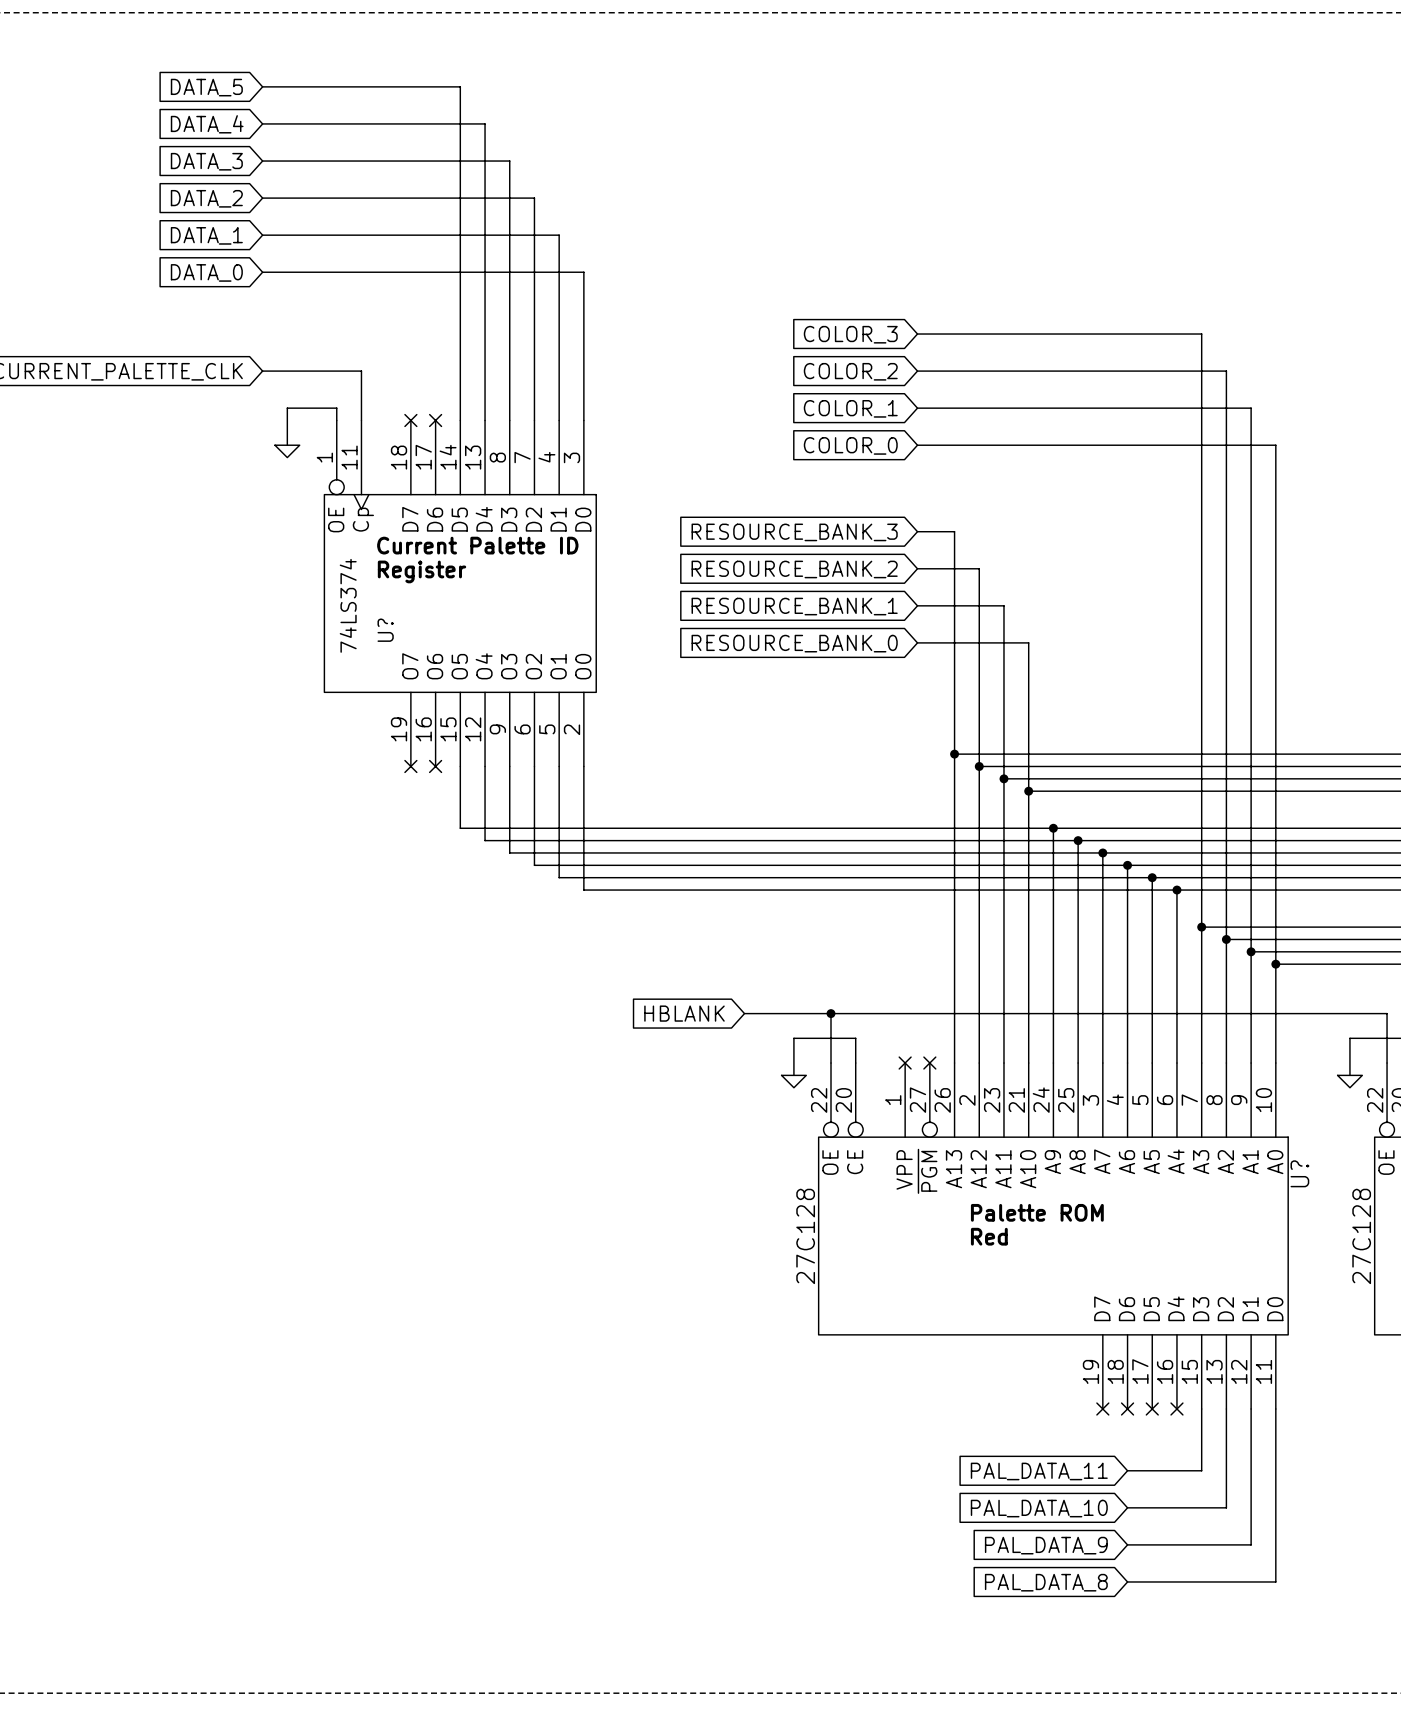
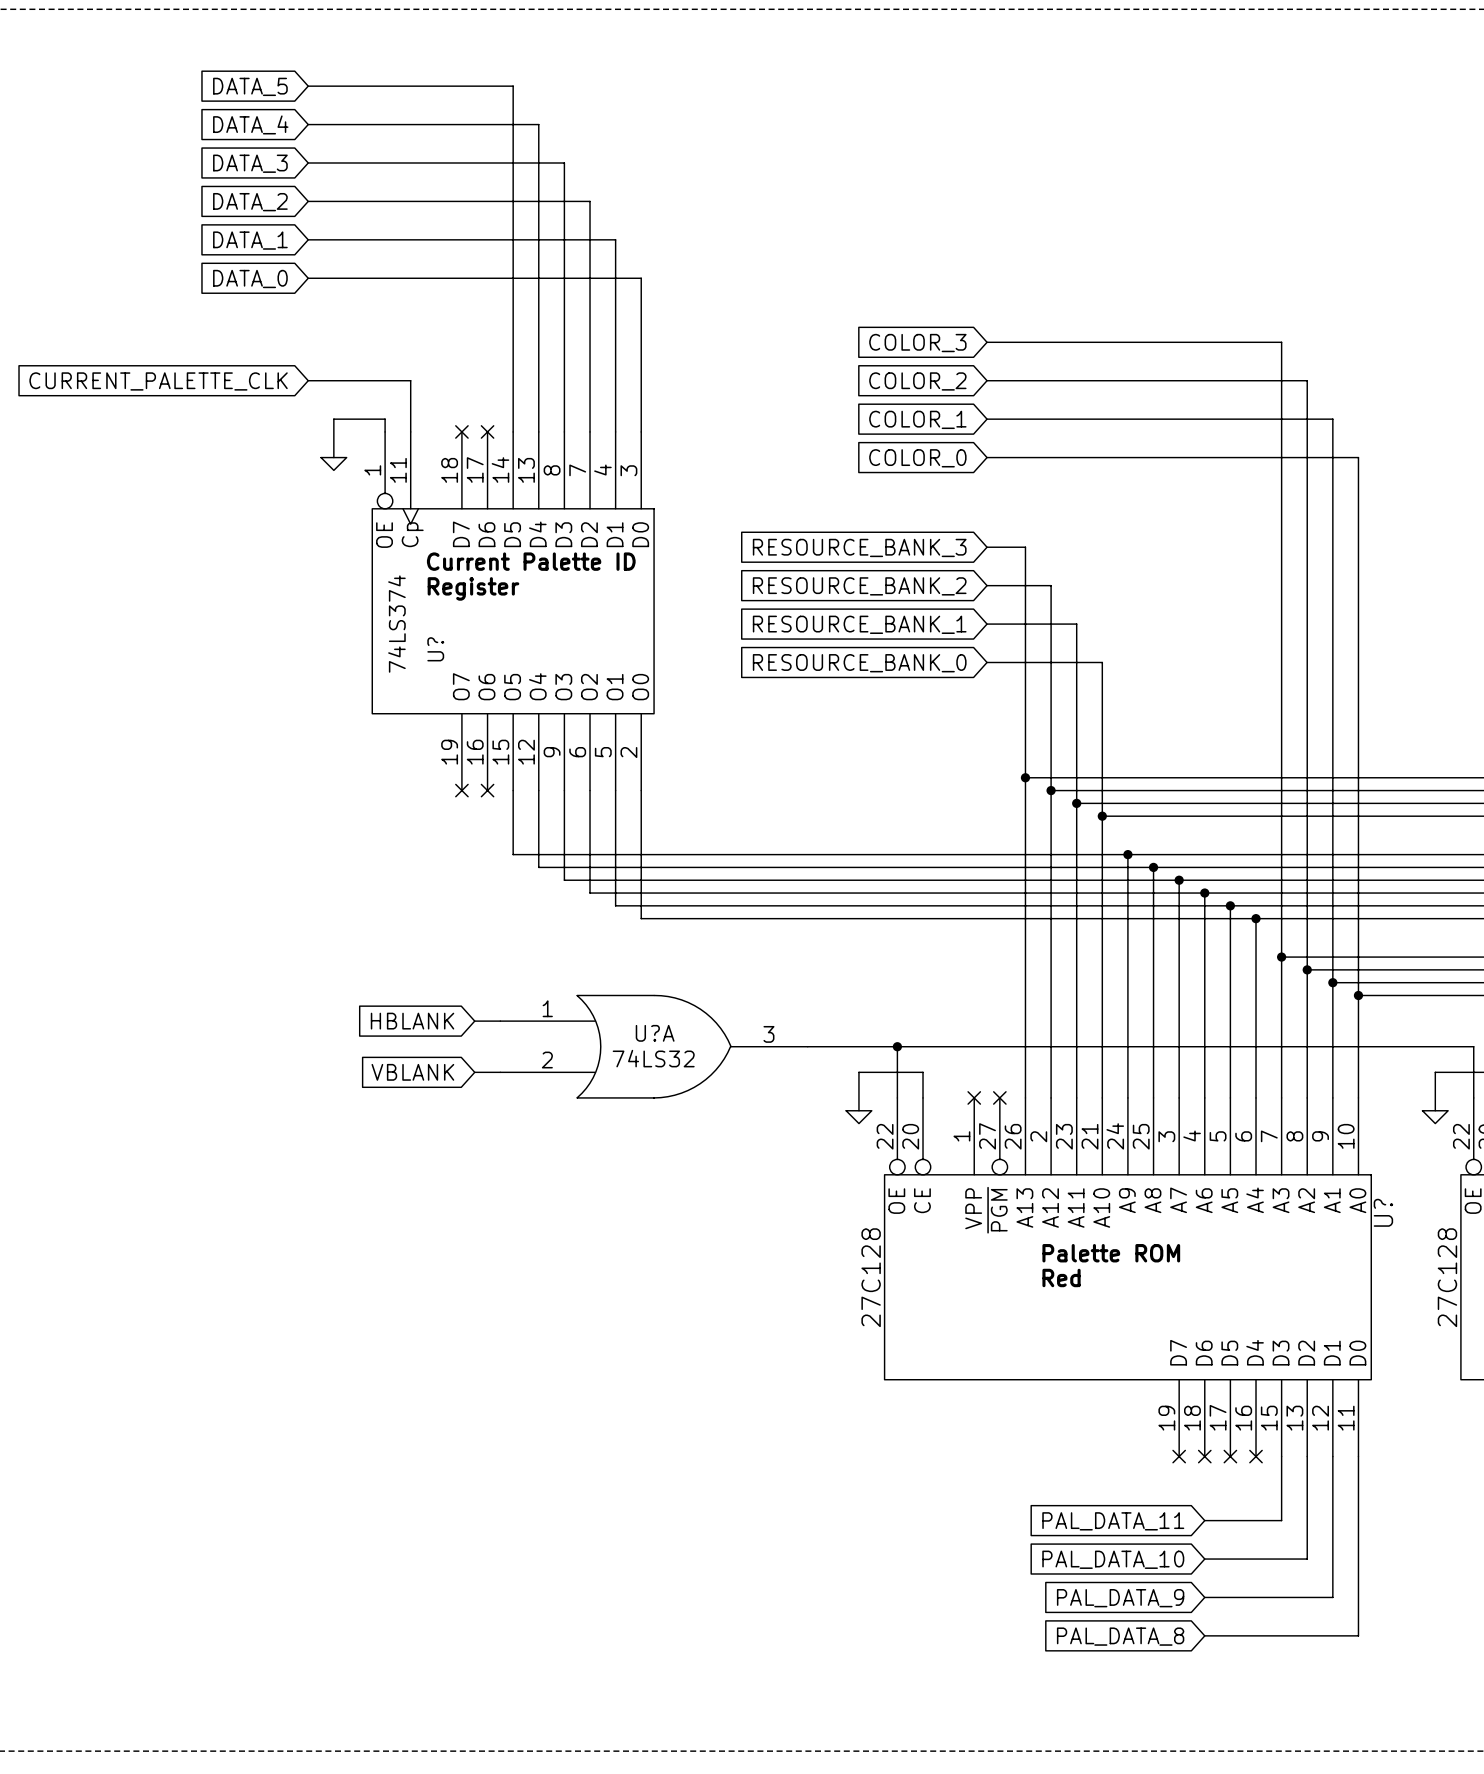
global label: none -> HBLANK (412, 1021)
wire: none -> (474, 1021) (500, 1021)
U?A: none -> 74LS32 (654, 1046)
global label: HBLANK (684, 1013) -> none
global label: none -> VBLANK (412, 1072)
wire: none -> (474, 1072) (500, 1072)

